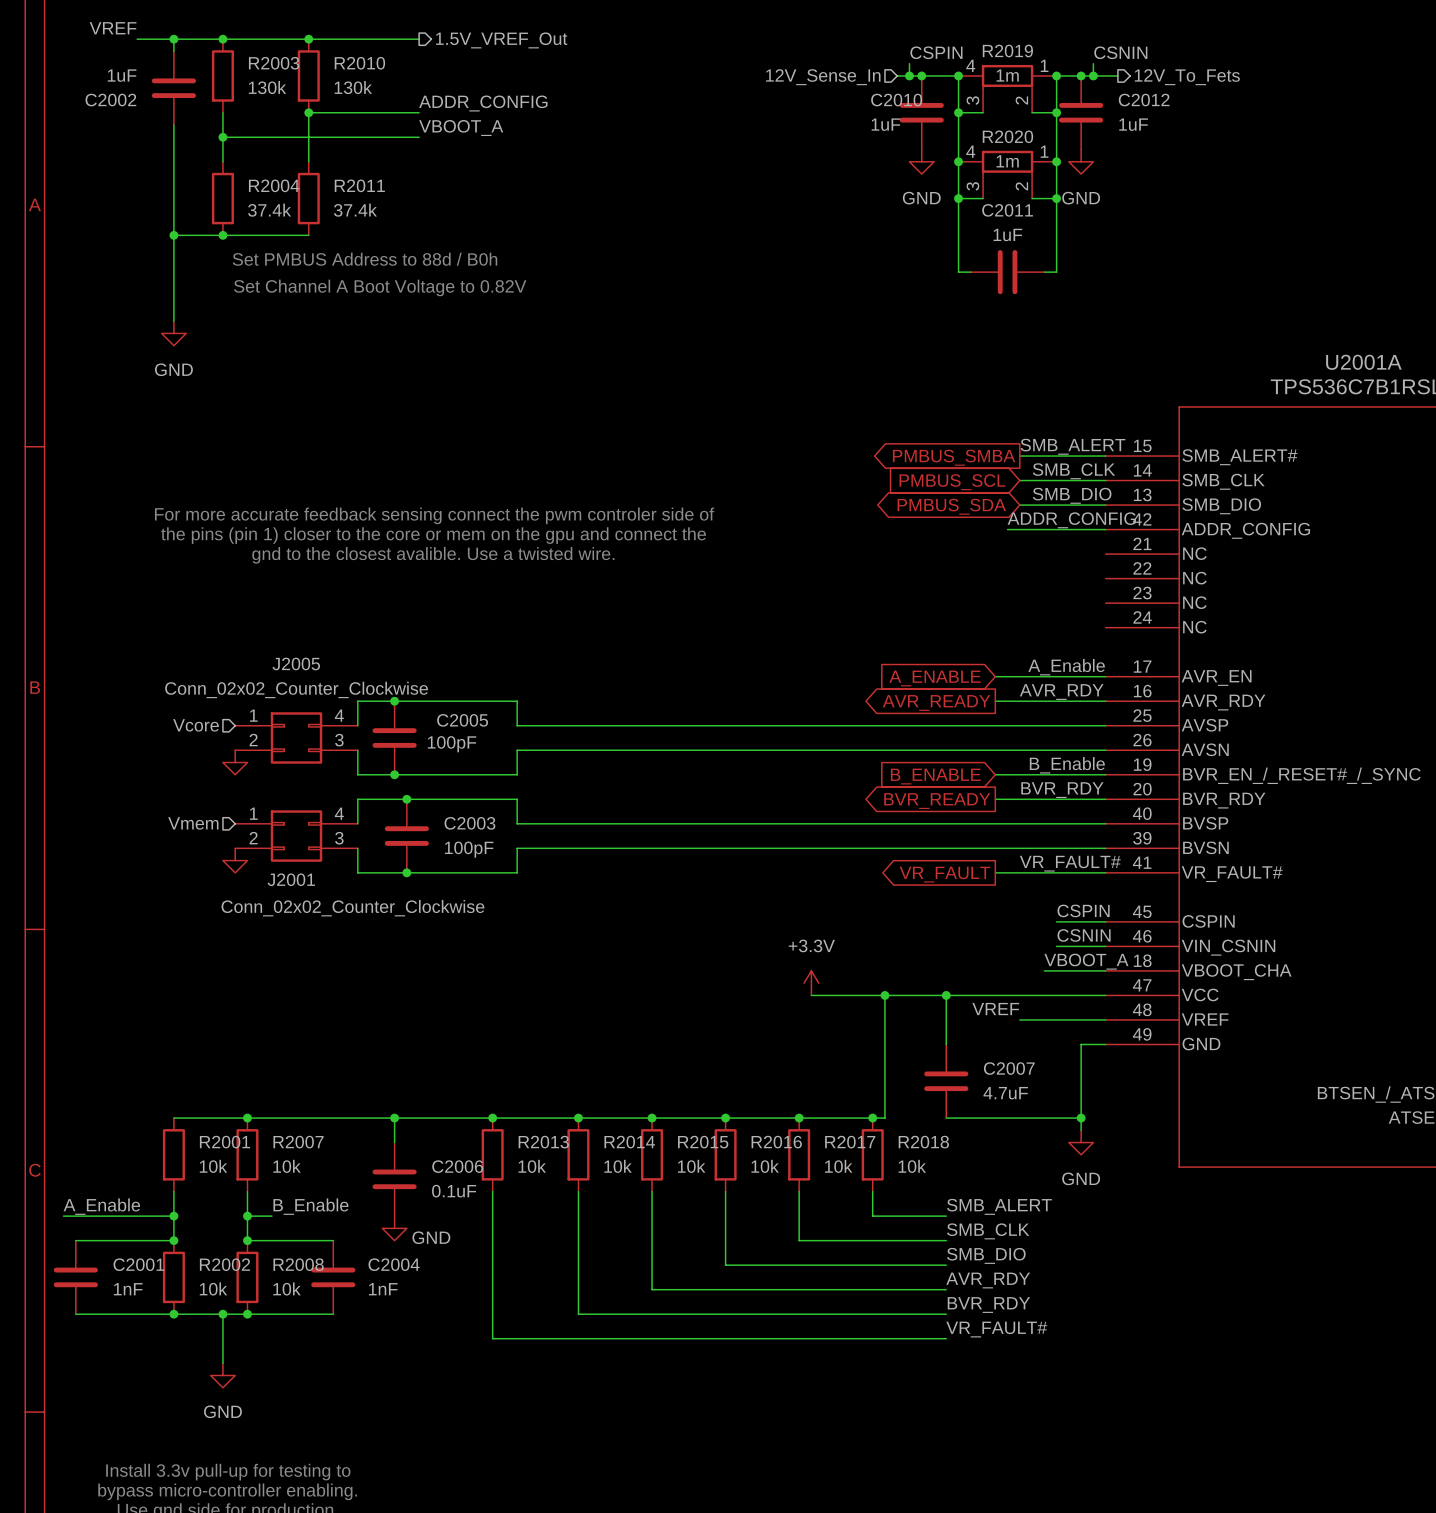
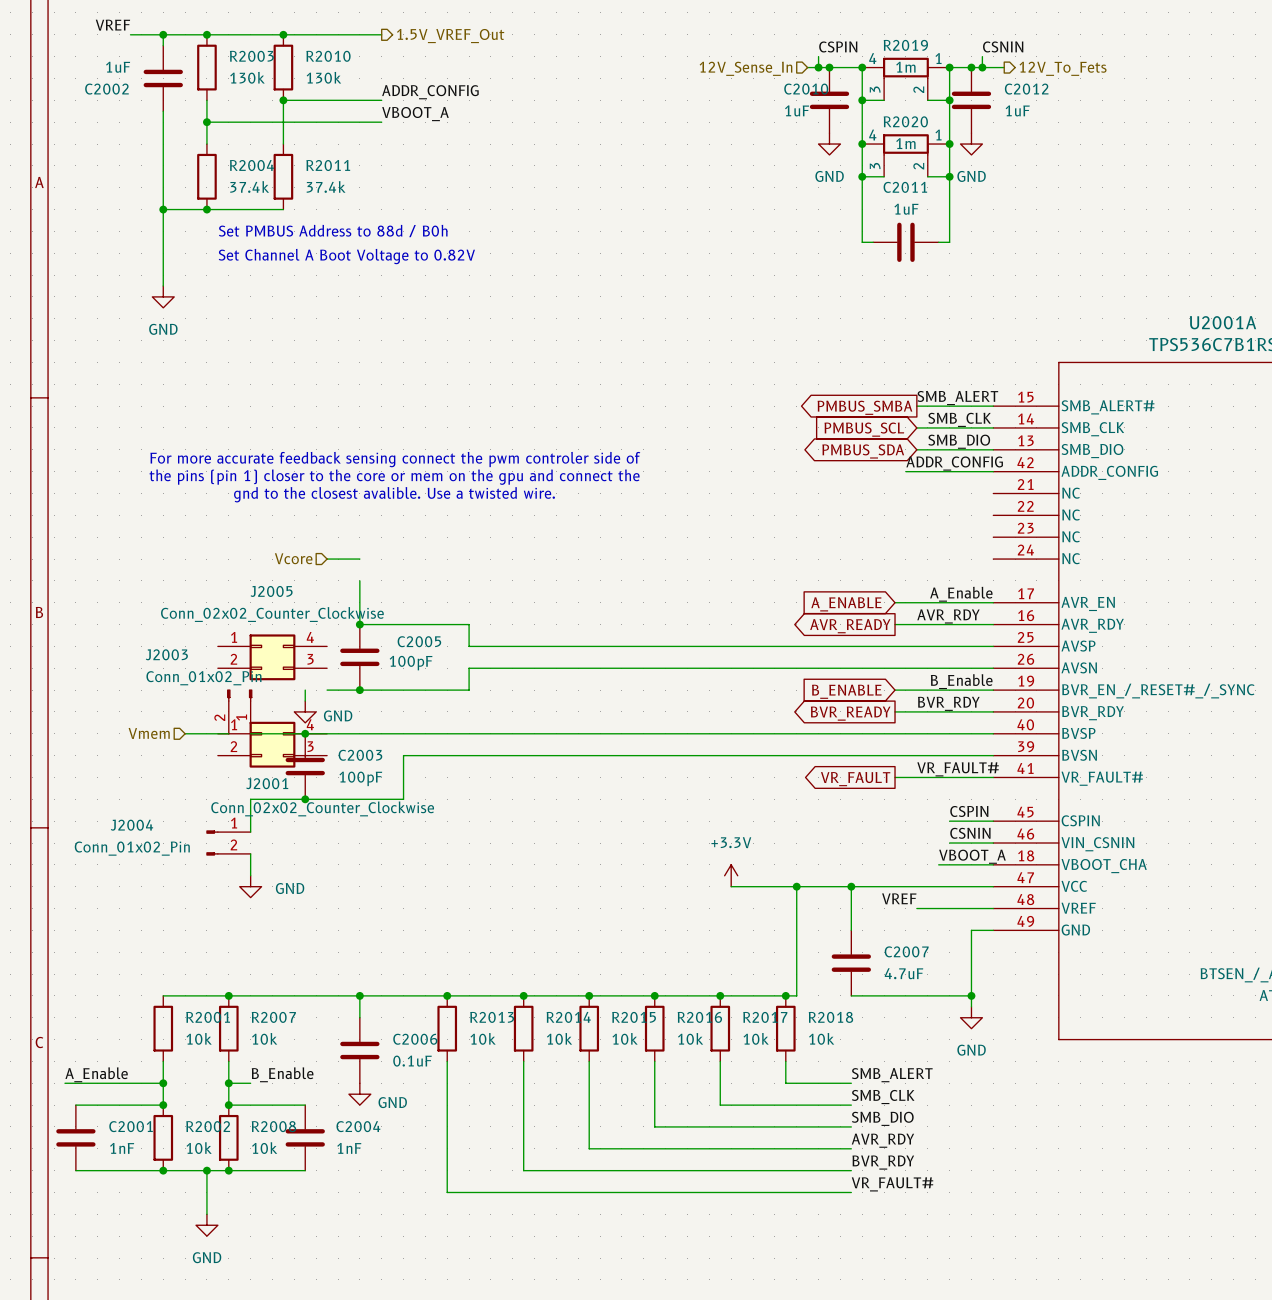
wire: none -> (327, 559) (359, 559)
wire: (394, 701) (357, 701) (357, 725) -> (359, 624) (359, 580)
hierarchical label position: Vcore (196, 725) -> Vcore (293, 558)
wire: (357, 750) (357, 774) -> (250, 853) (250, 875)
power symbol: (235, 762) -> none
wire: none -> (305, 690) (305, 701)
J2003: none -> Conn_01x02_Pin (239, 711)
power symbol: none -> GND (305, 711)
junction: (406, 799) -> none
hierarchical label position: Vmem (193, 823) -> Vmem (149, 733)
wire: none -> (185, 733) (228, 733)
junction: none -> (305, 733)
wire: (357, 823) (357, 799) (517, 799) (517, 823) -> (250, 733) (469, 733)
C2003 position: (406, 836) -> (305, 766)
wire: (357, 848) (357, 872) (517, 872) (517, 848) -> (250, 832) (250, 799) (403, 799) (403, 755) (469, 755)
power symbol: (235, 860) -> none
junction: (406, 872) -> none
junction: none -> (305, 799)
J2004: none -> Conn_01x02_Pin (228, 843)
power symbol: none -> GND (250, 886)

